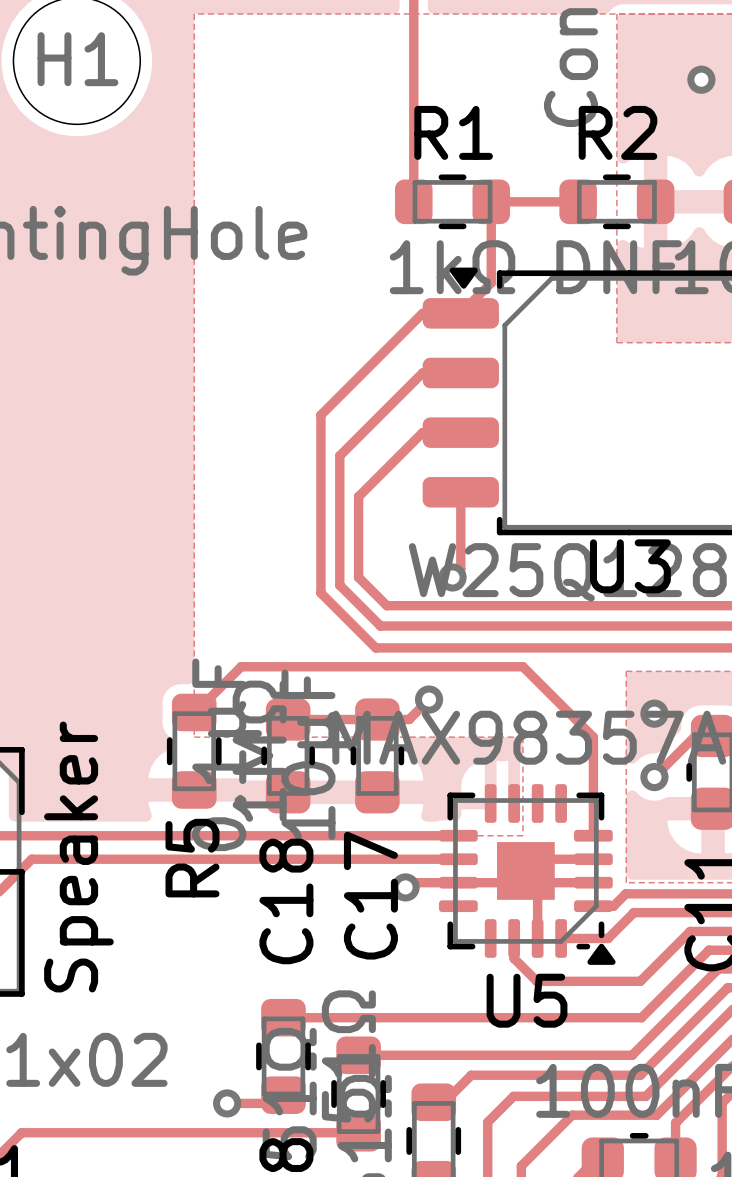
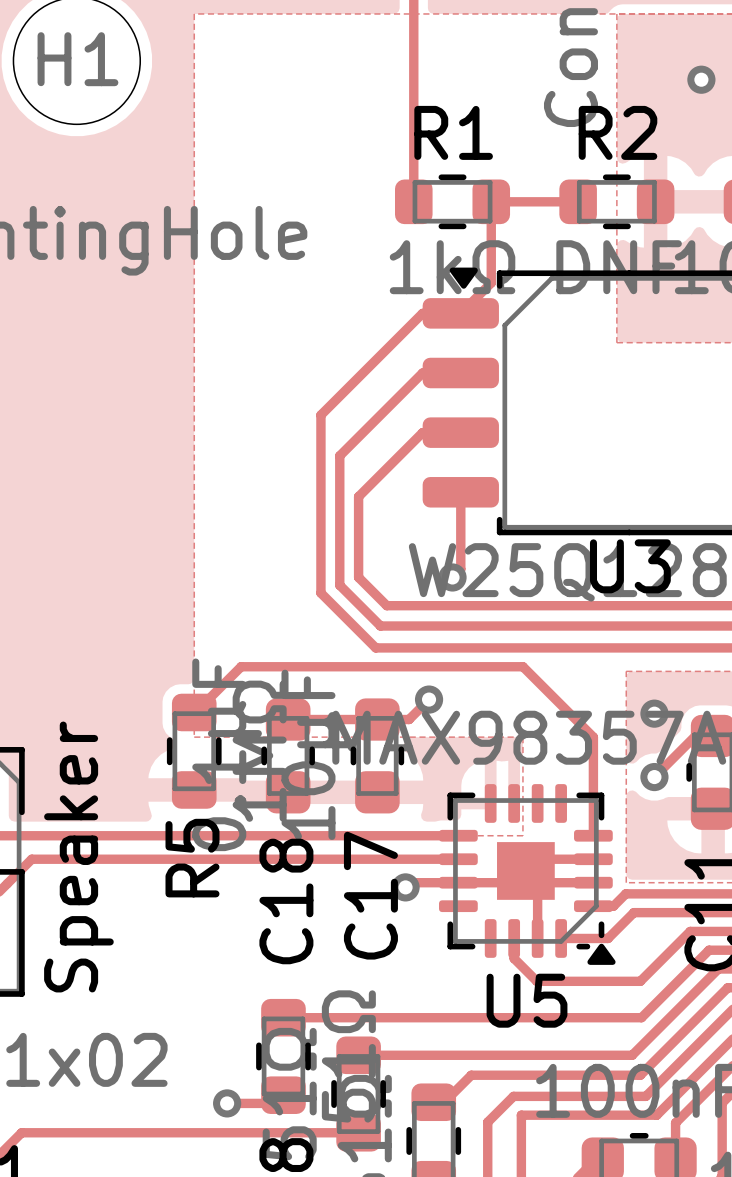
track: (572, 1115) (521, 1166) -> (572, 1115) (521, 1115) (521, 1166)

